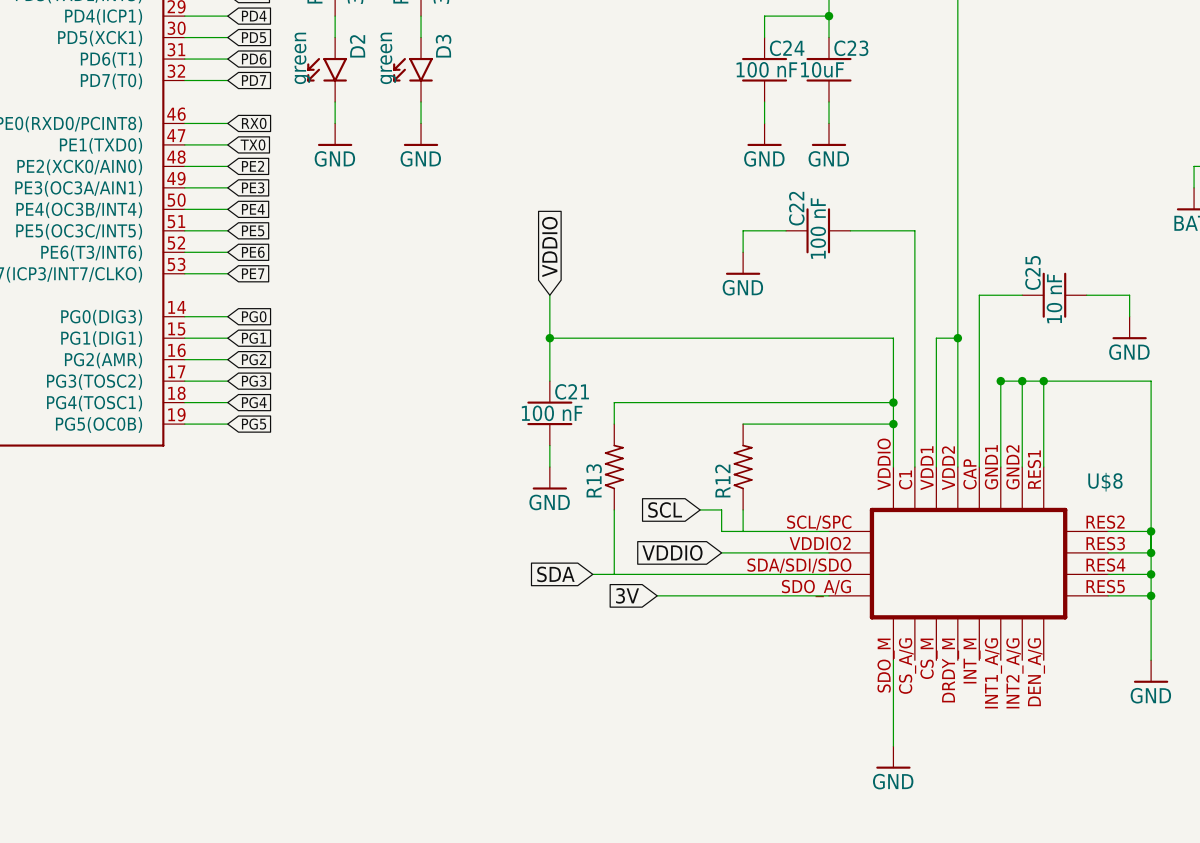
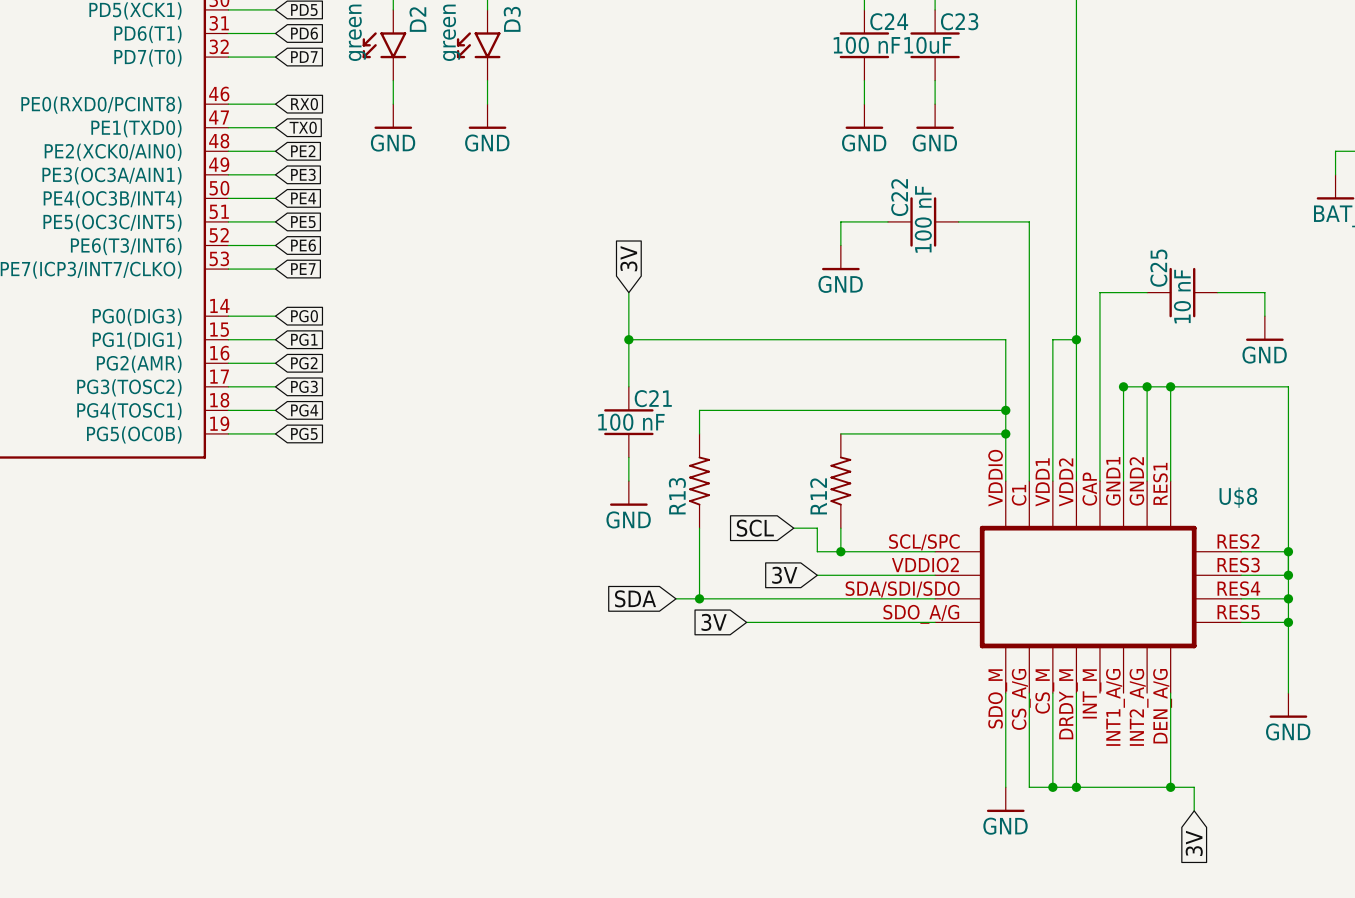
global label: VDDIO (549, 246) -> 3V (628, 258)
junction: none -> (840, 551)
global label: VDDIO (672, 552) -> 3V (784, 575)
junction: none -> (699, 598)
wire: none -> (1029, 693) (1029, 787) (1194, 787) (1194, 810)
wire: none -> (1052, 693) (1052, 787)
wire: none -> (1076, 693) (1076, 787)
wire: none -> (1170, 693) (1170, 787)
junction: none -> (1052, 787)
junction: none -> (1076, 787)
junction: none -> (1170, 787)
global label: none -> 3V (1194, 843)

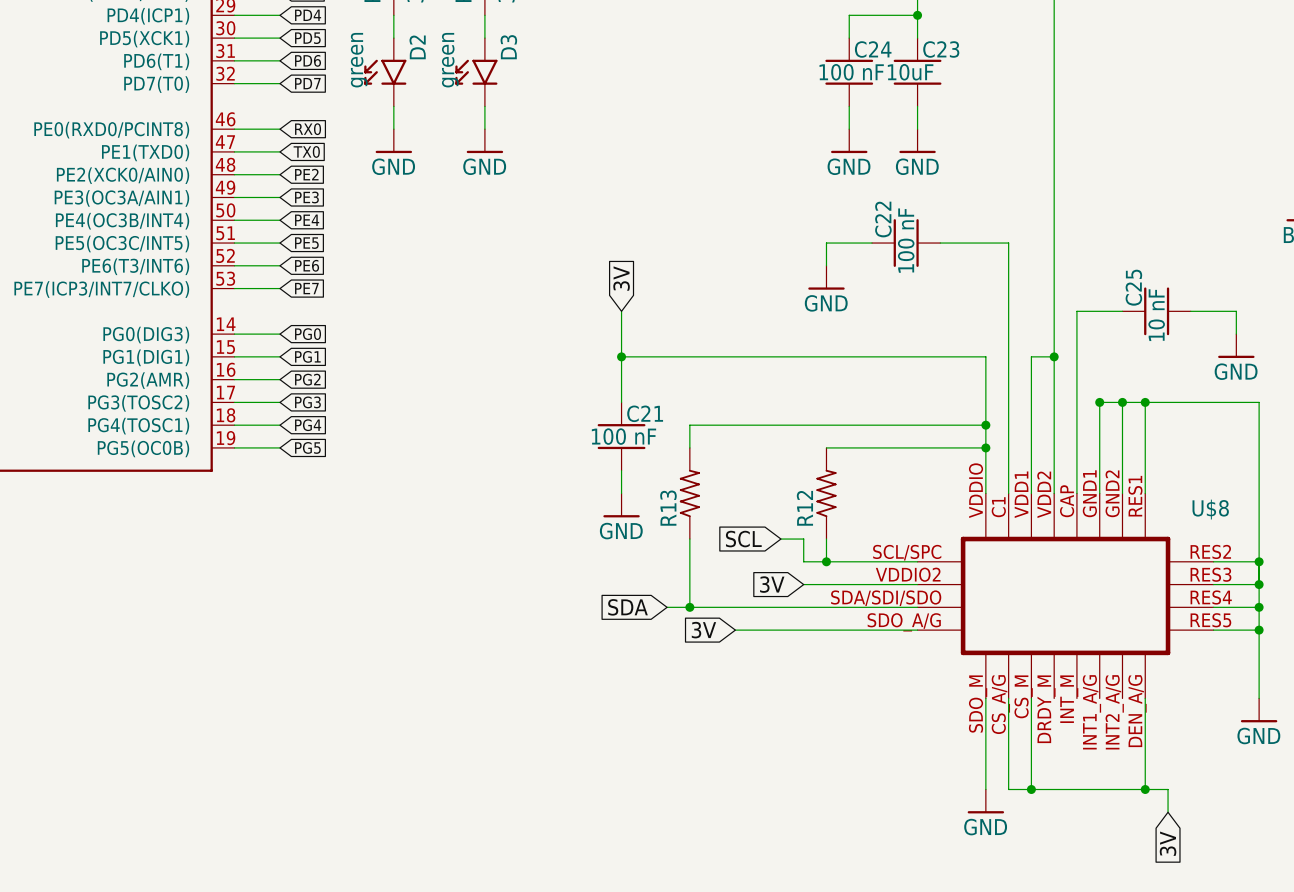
wire: (1076, 693) (1076, 787) -> none
junction: (1076, 787) -> none

